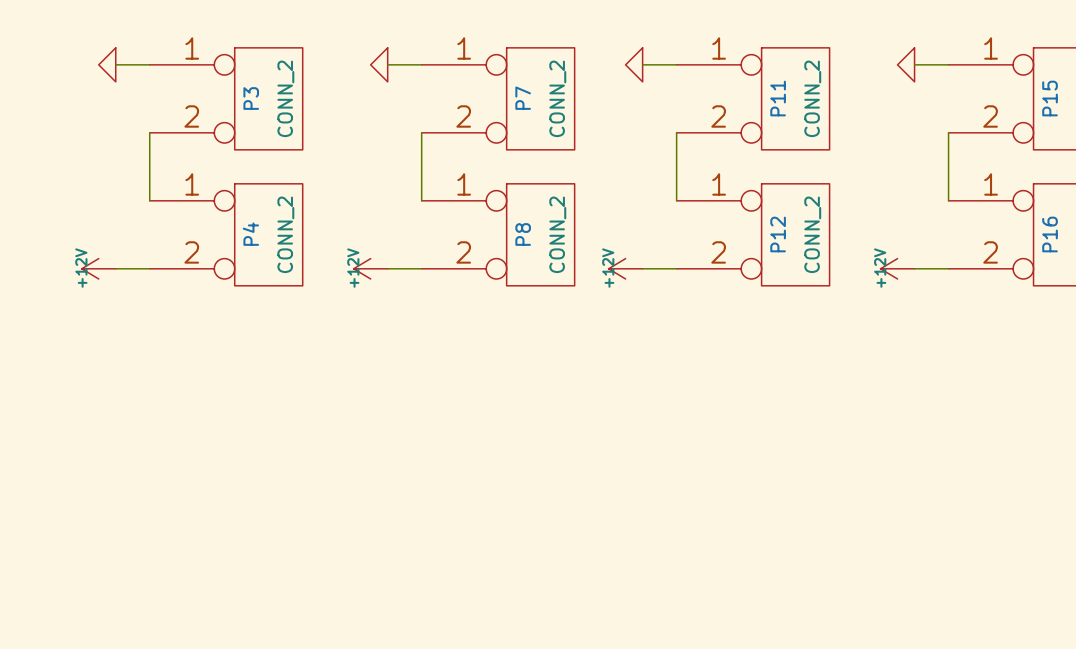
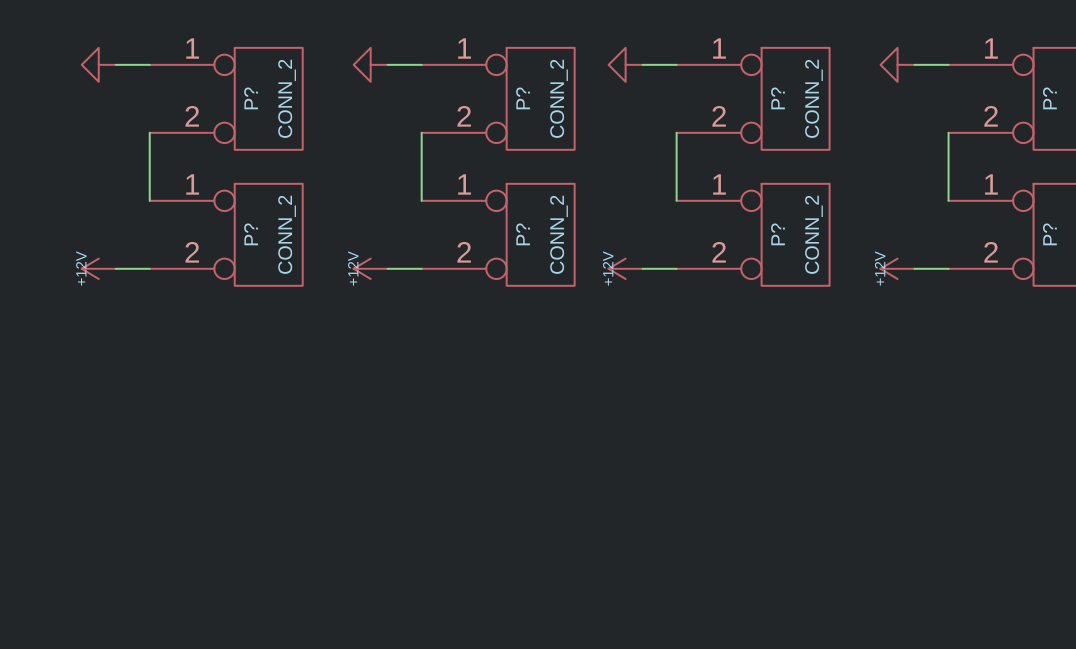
power symbol shape: [98, 47, 116, 82] -> [81, 47, 116, 82]
power symbol shape: [370, 47, 388, 82] -> [353, 47, 388, 82]
power symbol shape: [625, 47, 643, 82] -> [608, 47, 643, 82]
power symbol shape: [897, 47, 915, 82] -> [880, 47, 915, 82]
P3 name: P3 (251, 98) -> P? (251, 98)
P7 name: P7 (523, 98) -> P? (523, 98)
P11 name: P11 (778, 98) -> P? (777, 98)
P15 name: P15 (1050, 98) -> P? (1049, 98)
P4 name: P4 (250, 234) -> P? (251, 234)
P8 name: P8 (523, 234) -> P? (523, 234)
P12 name: P12 (778, 234) -> P? (777, 234)
P16 name: P16 (1050, 234) -> P? (1049, 234)

